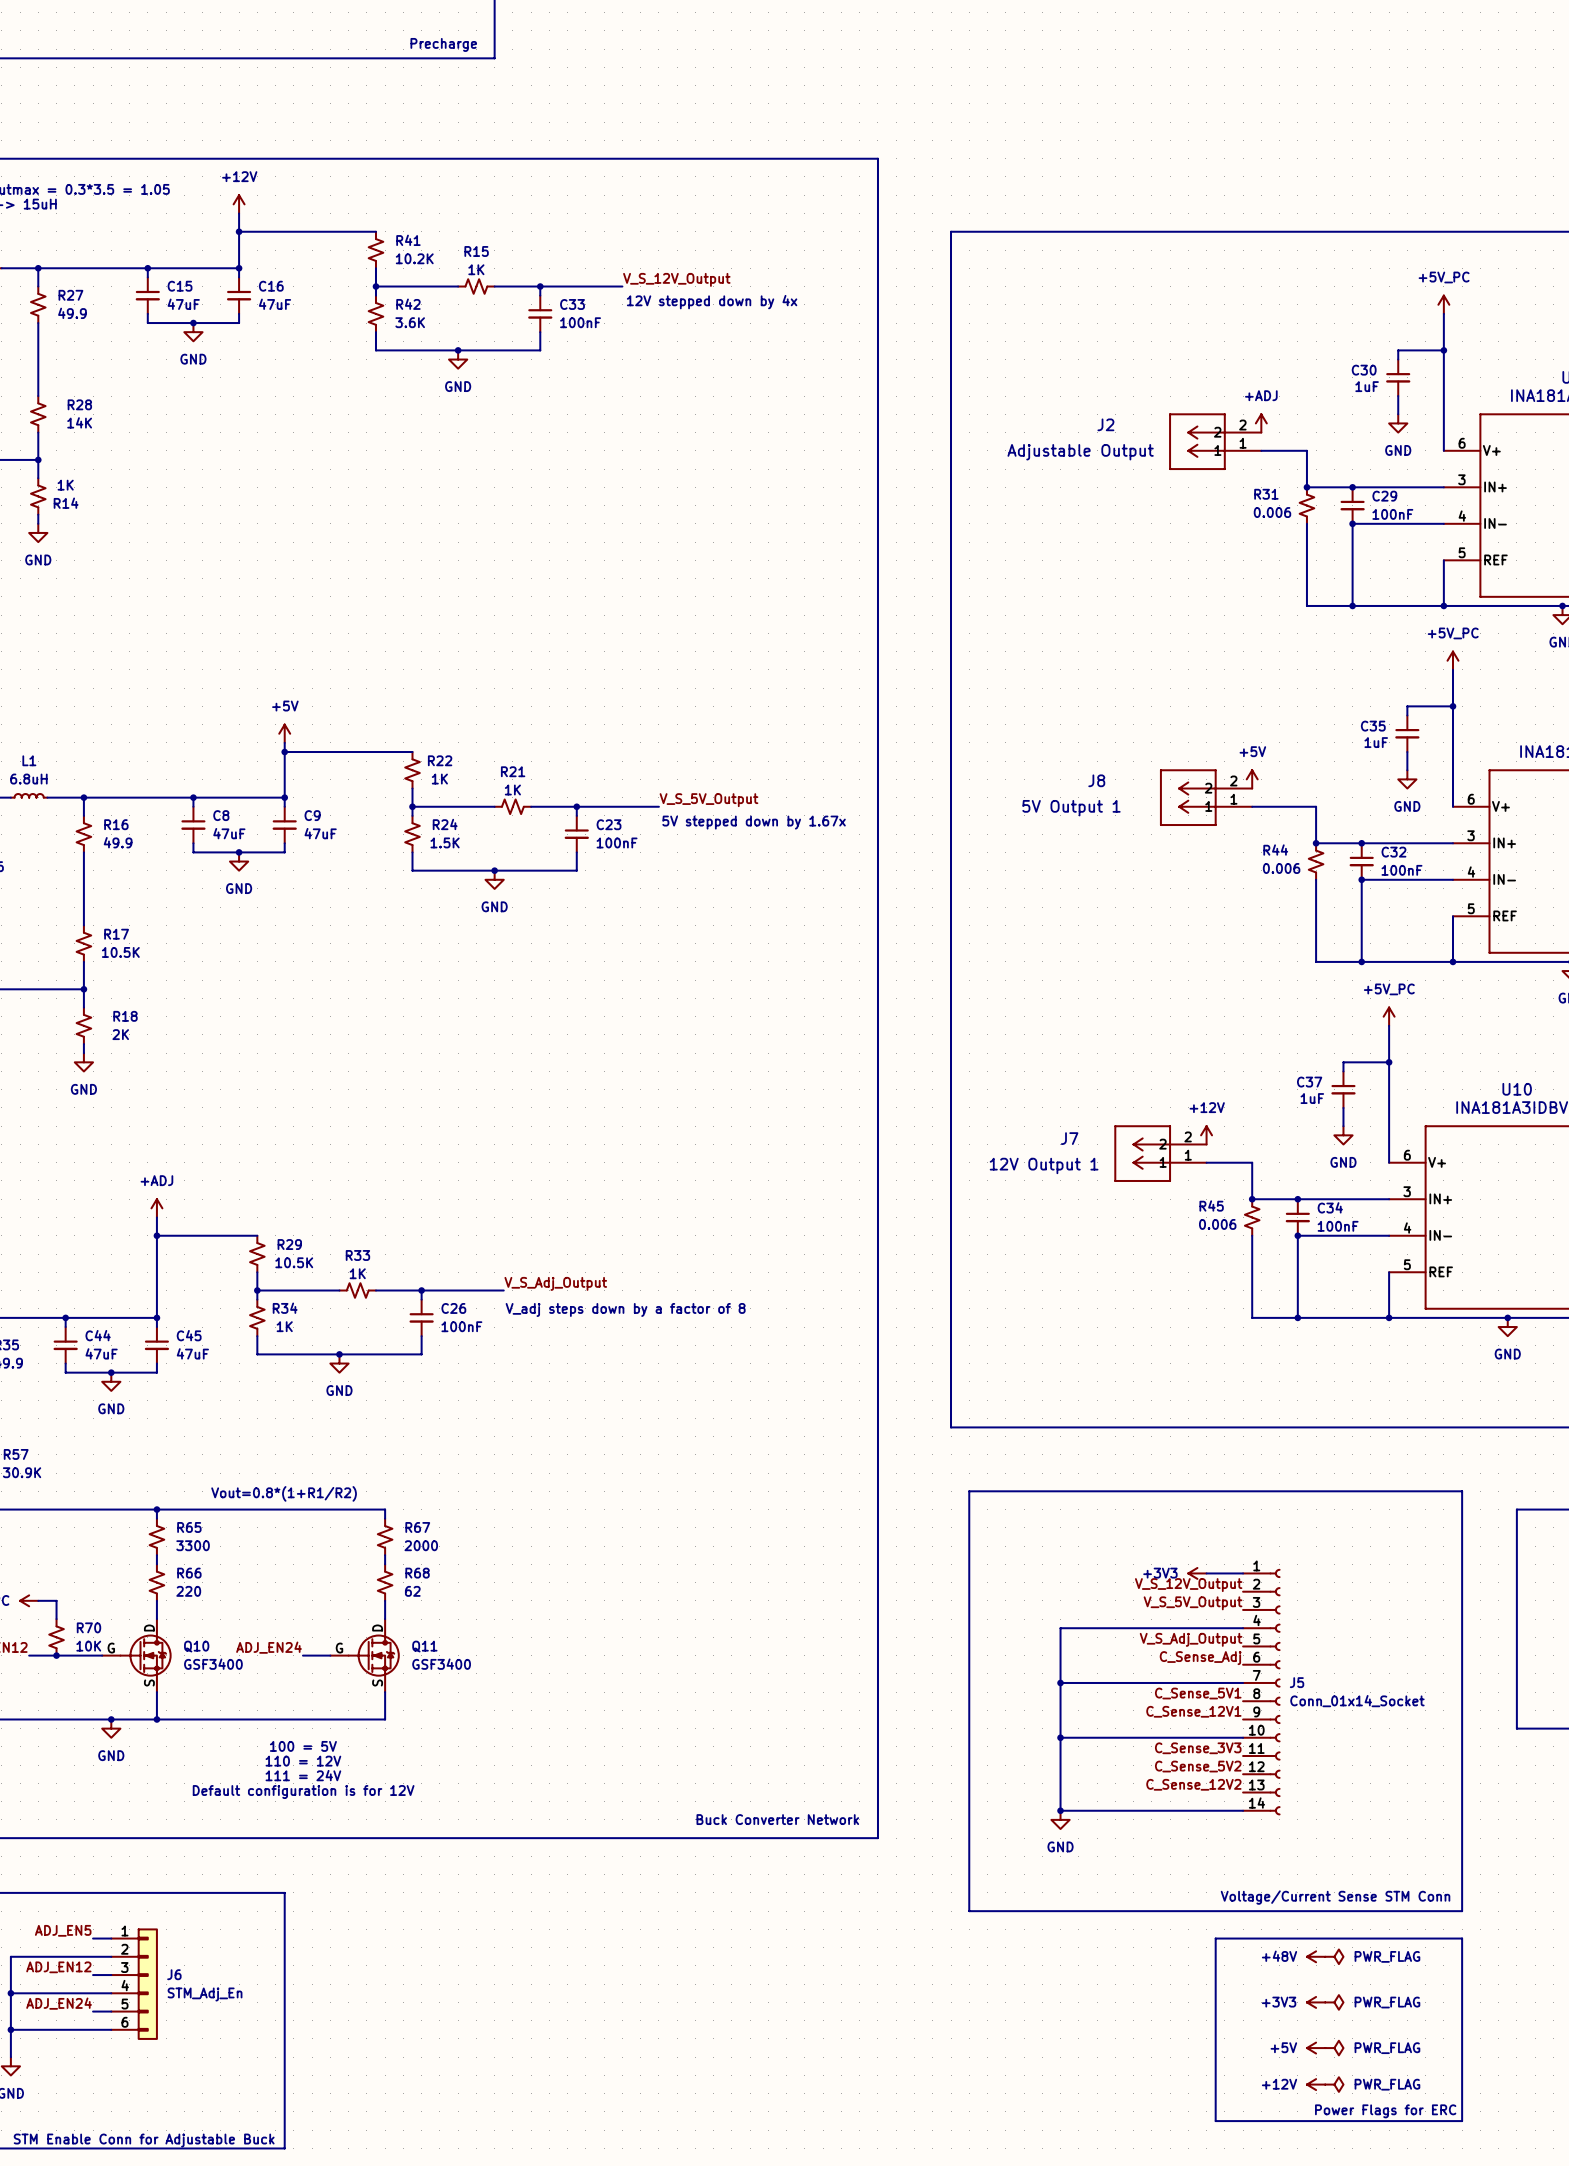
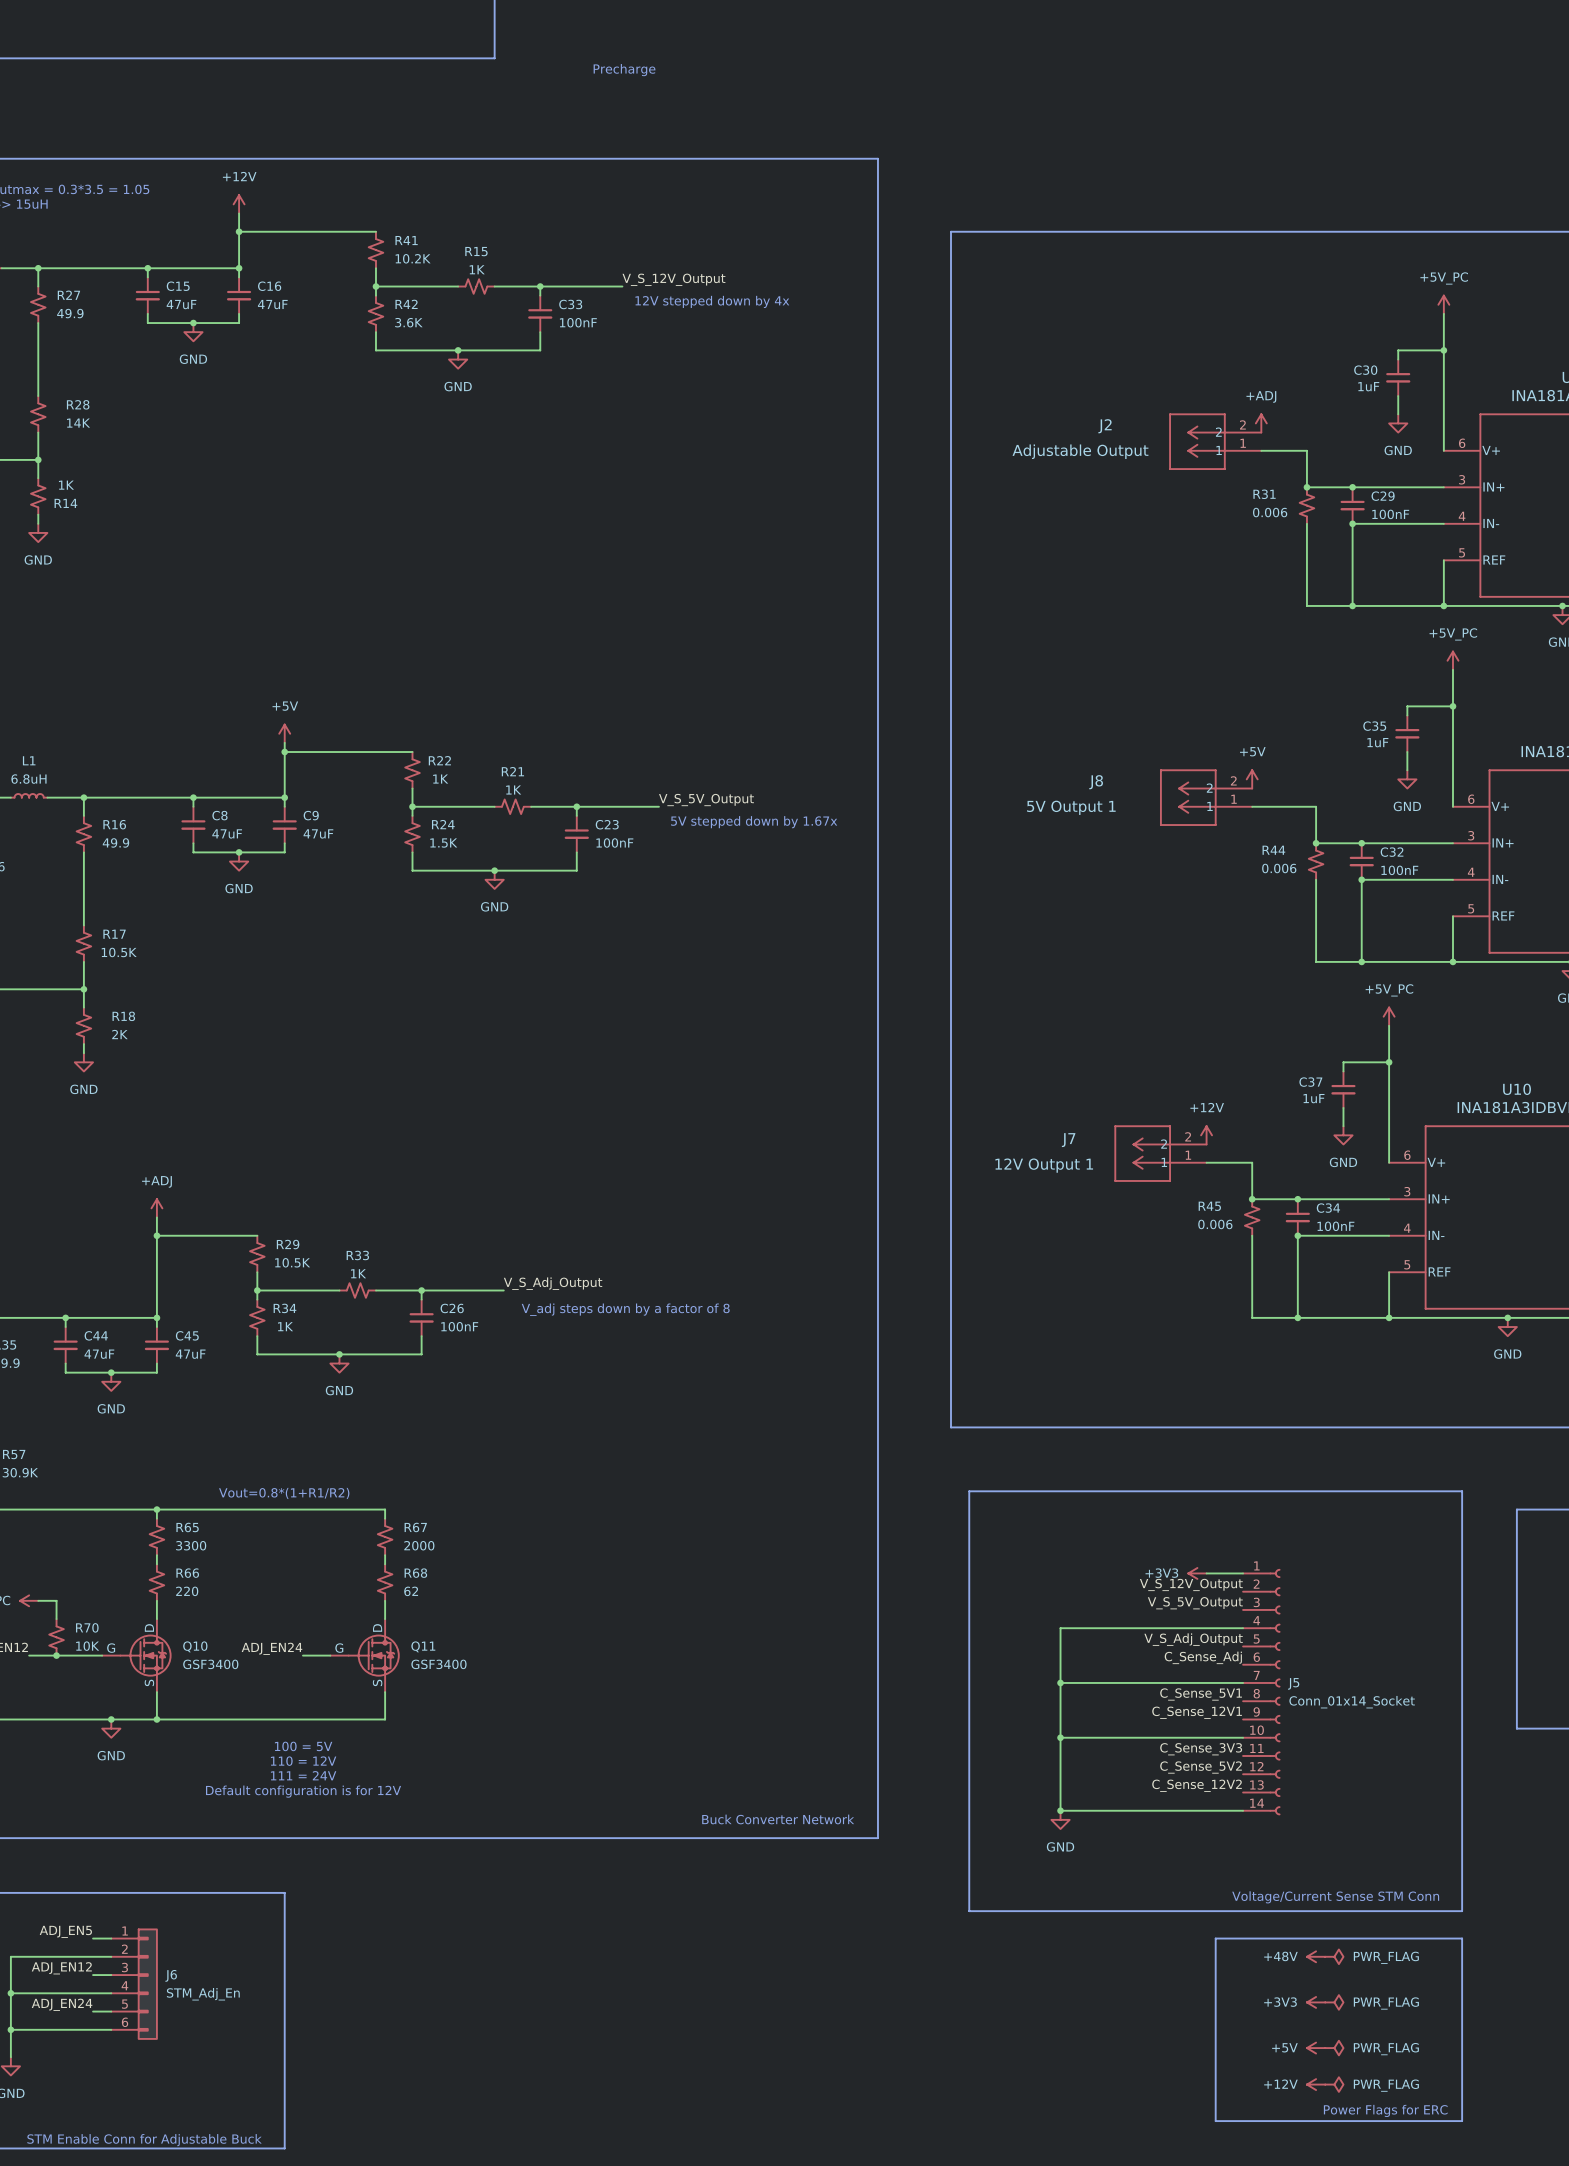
text: Precharge (443, 44) -> none
text: none -> Precharge (624, 70)

